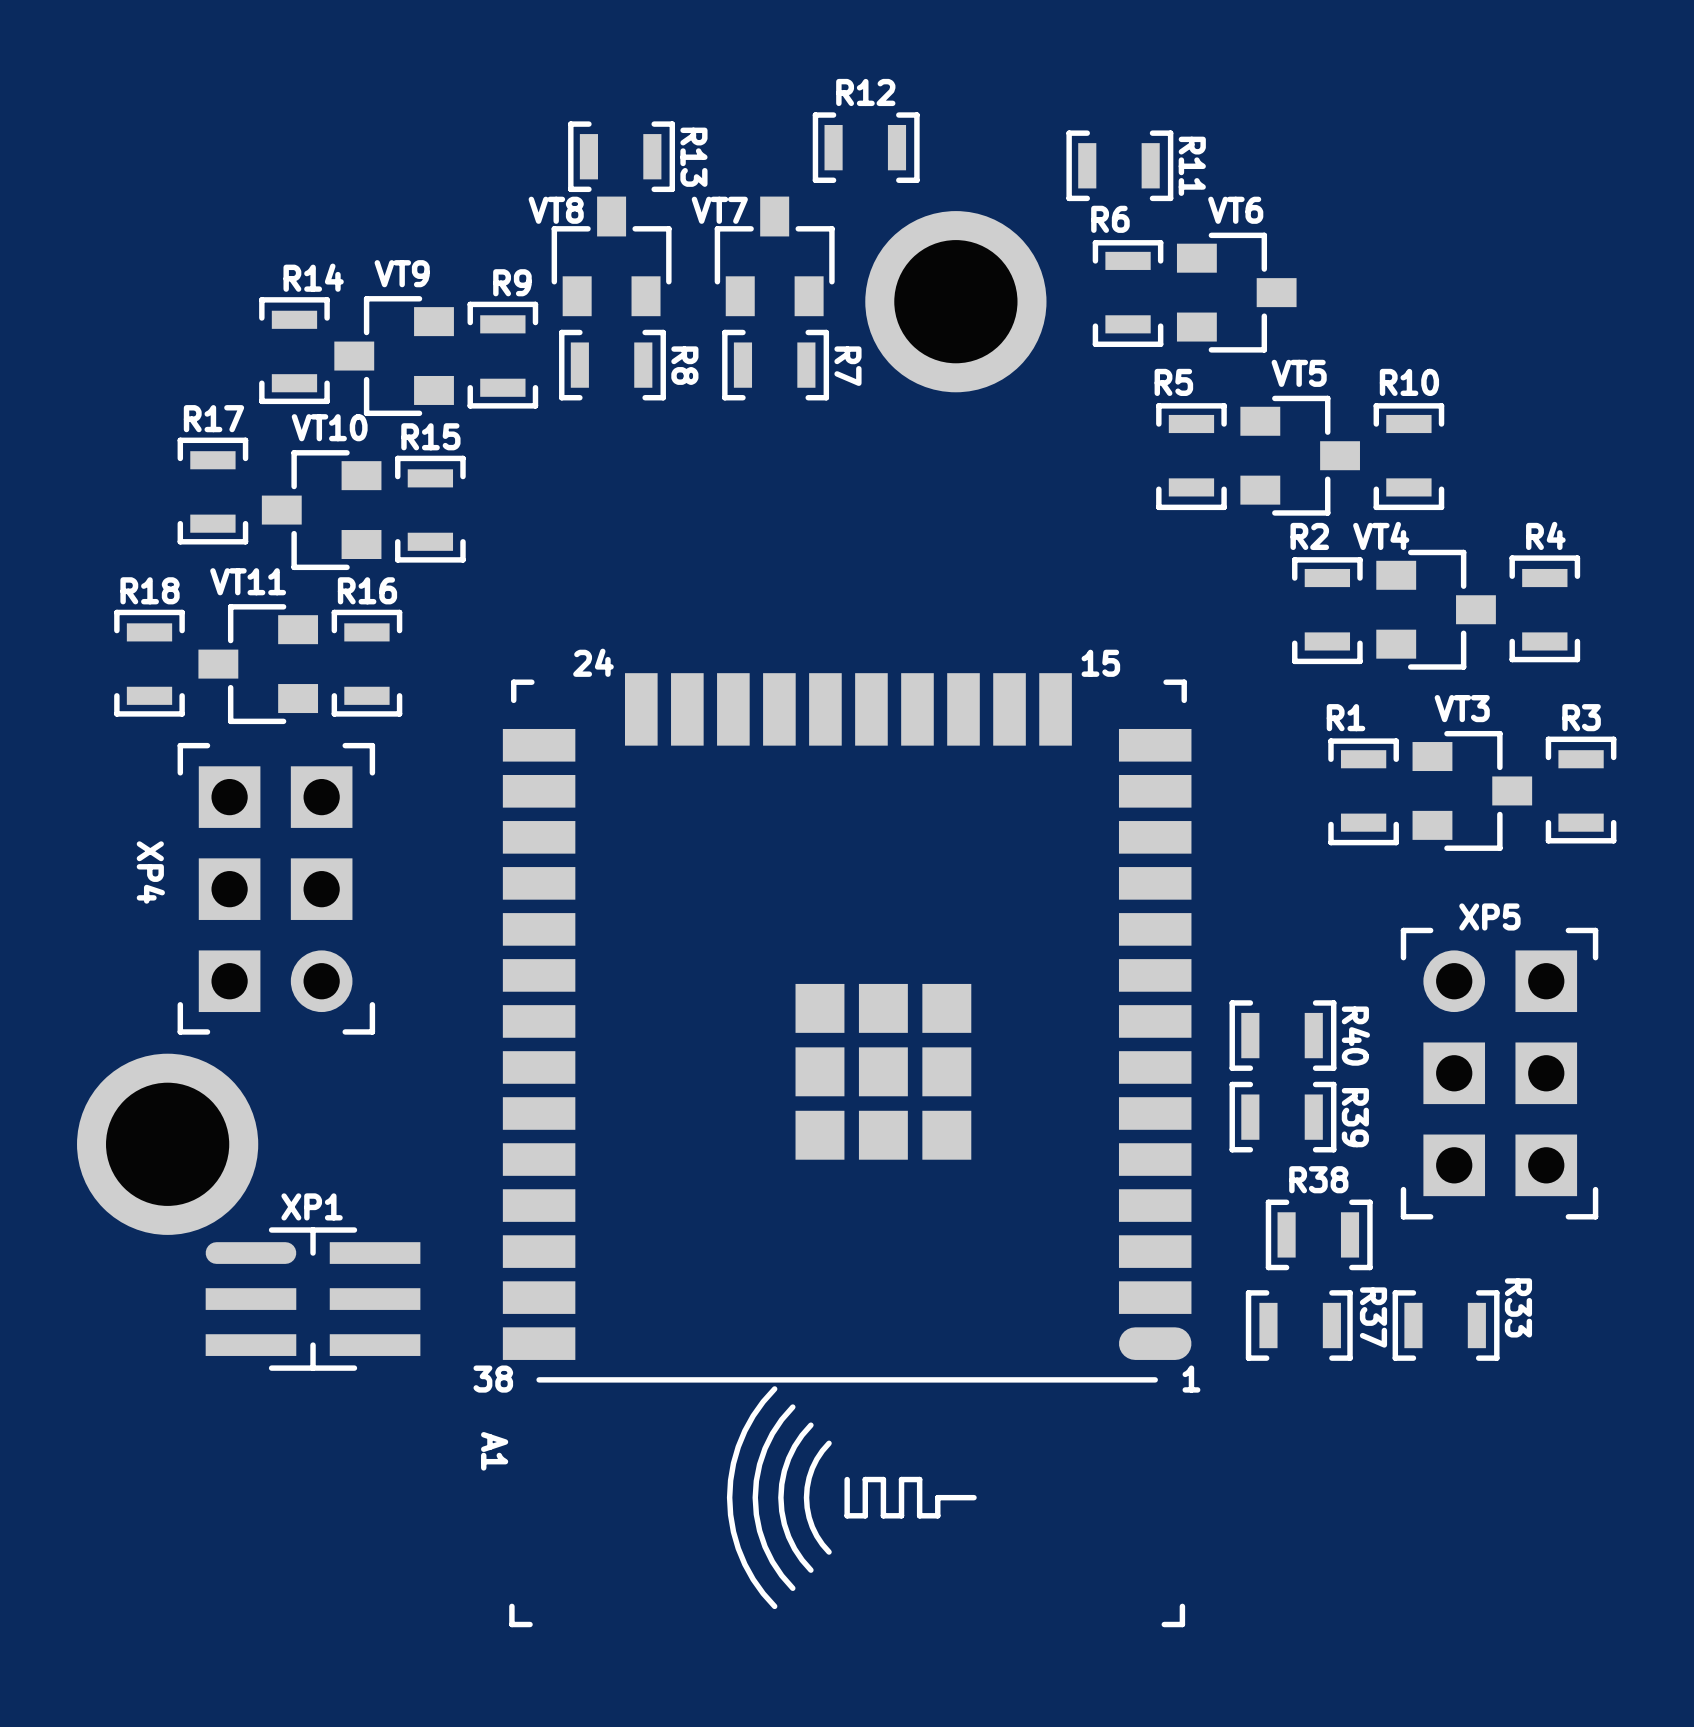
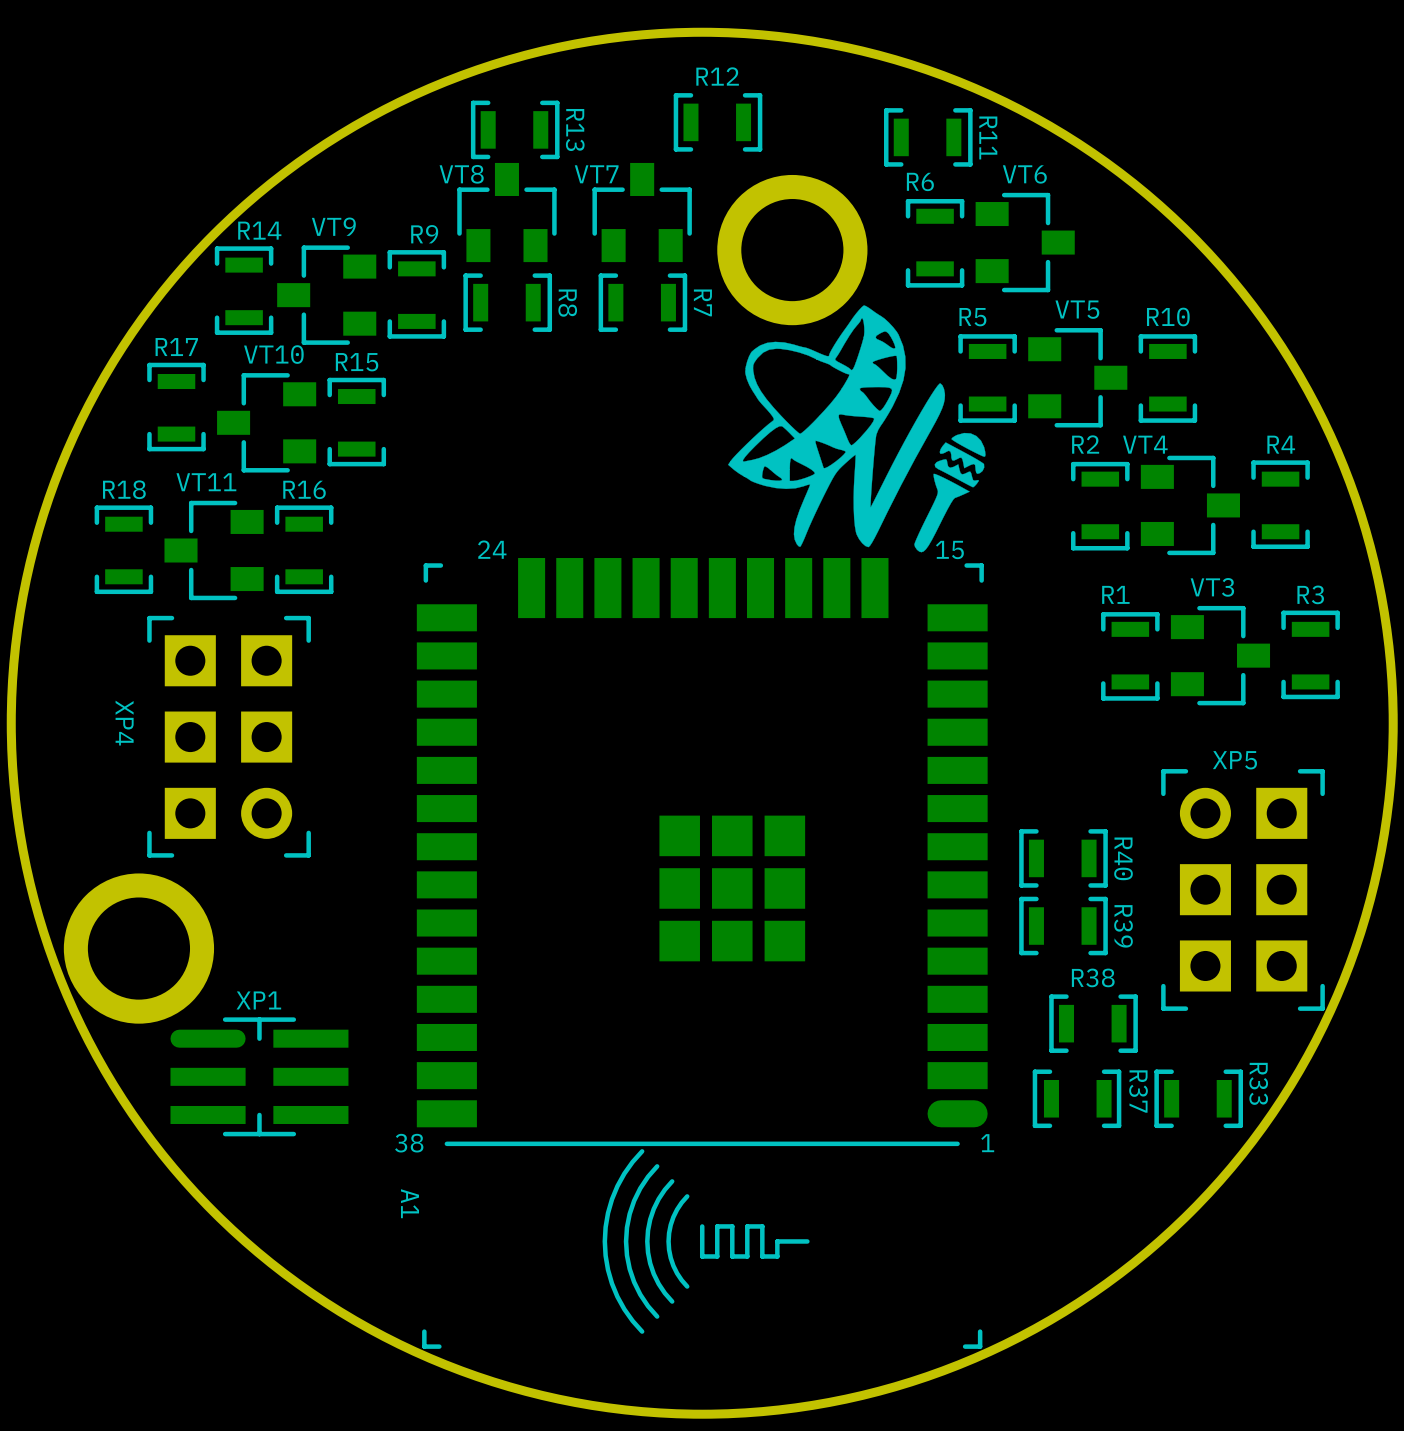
round board edge: none -> [6, 27, 1398, 1419]
drawing: none -> [728, 305, 986, 553]
A1 text position: 15 (1100, 663) -> 15 (949, 549)

